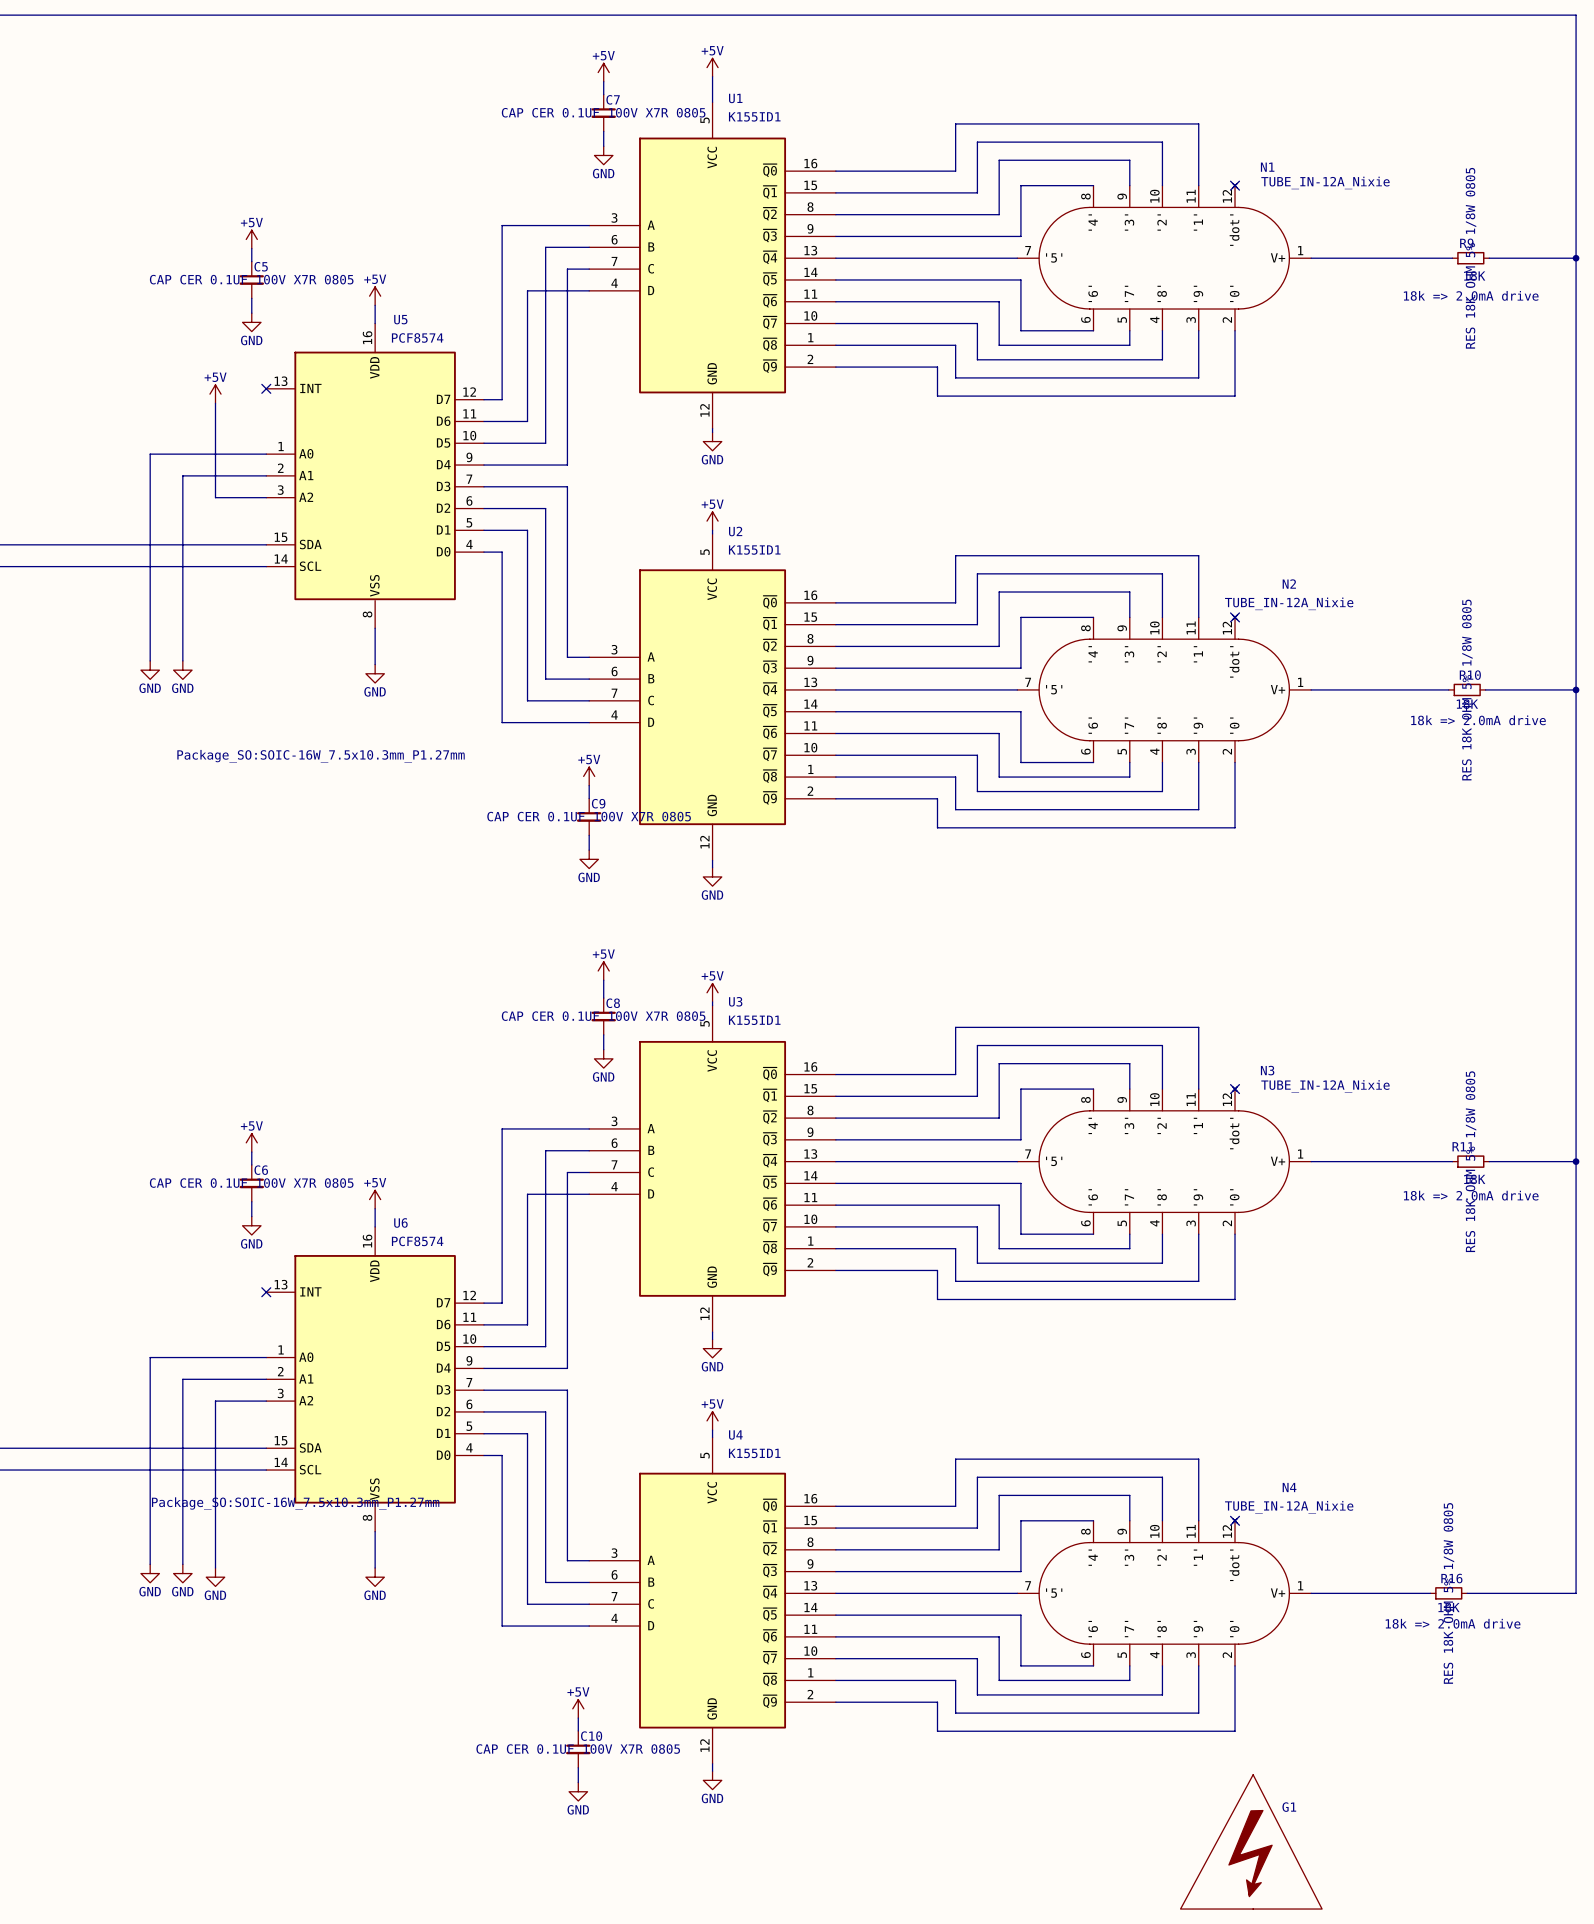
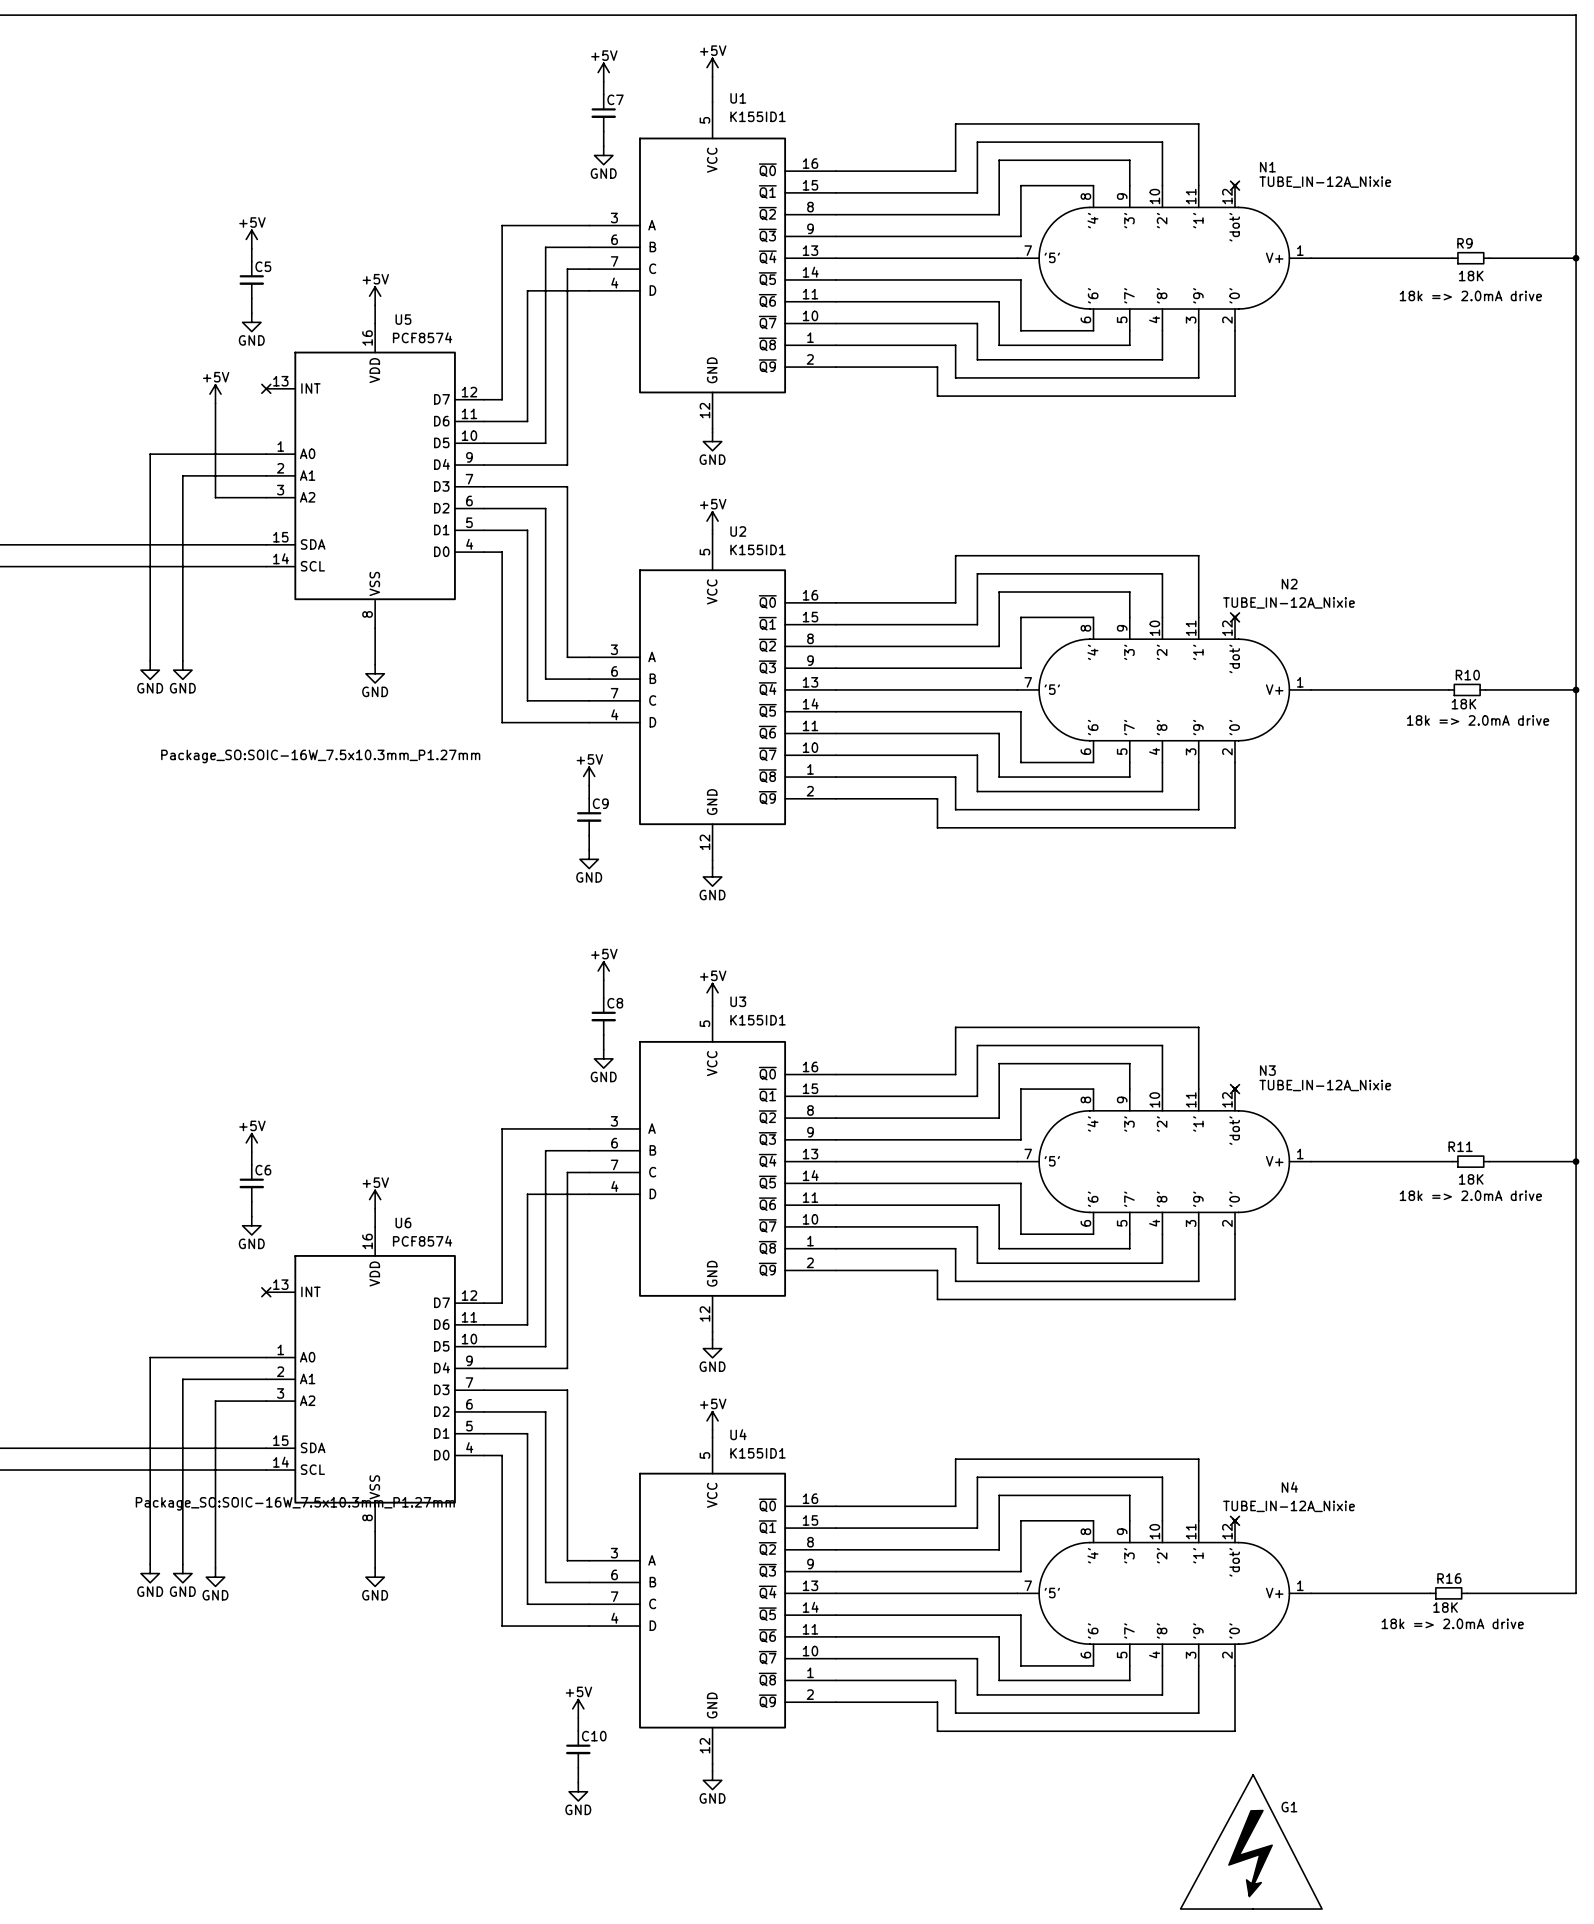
C7 text: CAP CER 0.1UF 100V X7R 0805 (603, 112) -> none
R9 text: RES 18K OHM 5% 1/8W 0805 (1470, 258) -> none
C5 text: CAP CER 0.1UF 100V X7R 0805 (251, 279) -> none
R10 text: RES 18K OHM 5% 1/8W 0805 (1467, 690) -> none
C9 text: CAP CER 0.1UF 100V X7R 0805 (589, 816) -> none
C8 text: CAP CER 0.1UF 100V X7R 0805 (603, 1016) -> none
R11 text: RES 18K OHM 5% 1/8W 0805 (1470, 1161) -> none
C6 text: CAP CER 0.1UF 100V X7R 0805 (251, 1183) -> none
R16 text: RES 18K OHM 5% 1/8W 0805 (1448, 1593) -> none
C10 text: CAP CER 0.1UF 100V X7R 0805 (578, 1749) -> none

